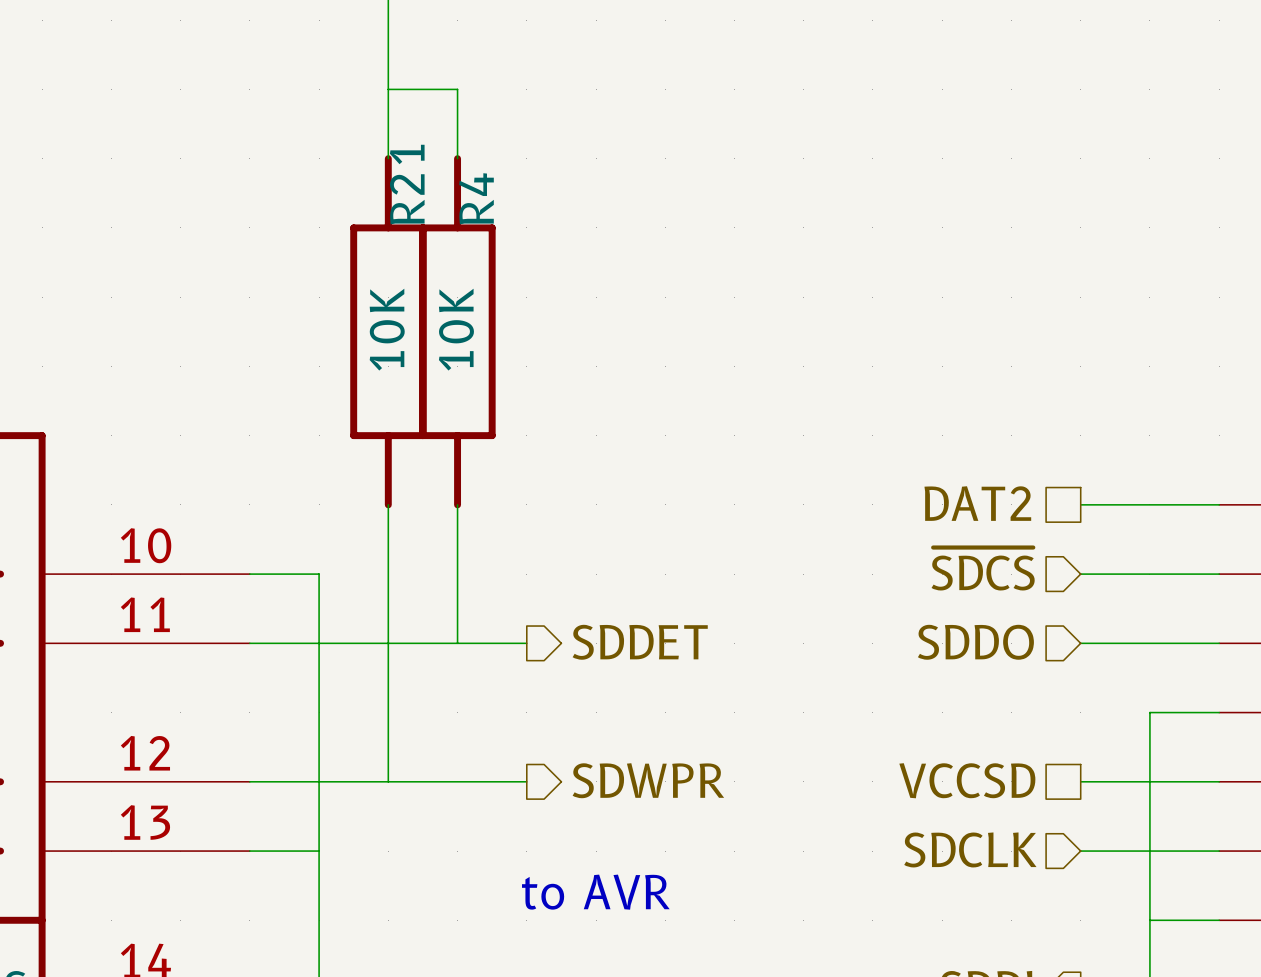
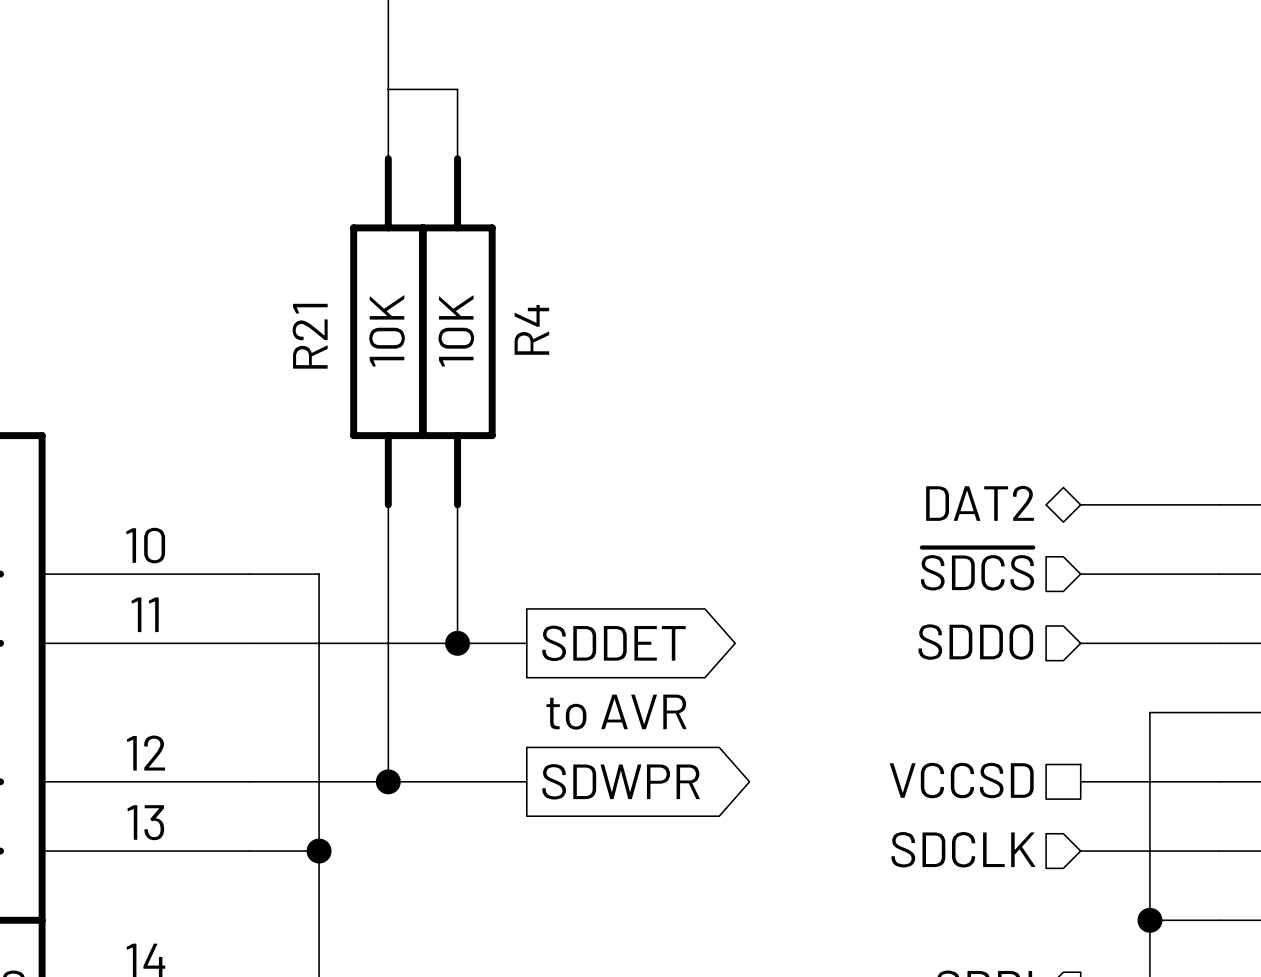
R21 name position: R21 (407, 184) -> R21 (310, 336)
R4 name position: R4 (476, 198) -> R4 (531, 329)
hierarchical label shape: passive (977, 503) -> bidirectional (980, 503)
hierarchical label: SDDET (640, 642) -> none
junction: none -> (457, 643)
global label: none -> SDDET (614, 643)
hierarchical label: SDWPR (648, 780) -> none
junction: none -> (388, 781)
global label: none -> SDWPR (621, 781)
junction: none -> (319, 851)
text position: to AVR (595, 892) -> to AVR (616, 712)
junction: none -> (1149, 920)

